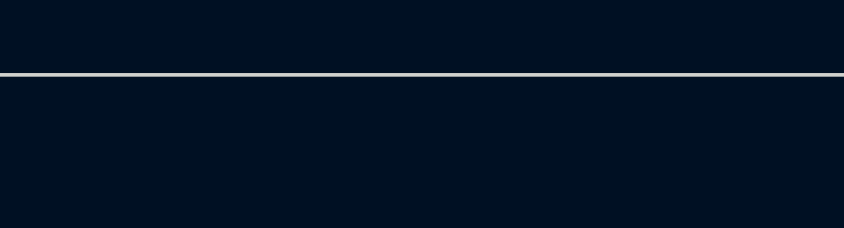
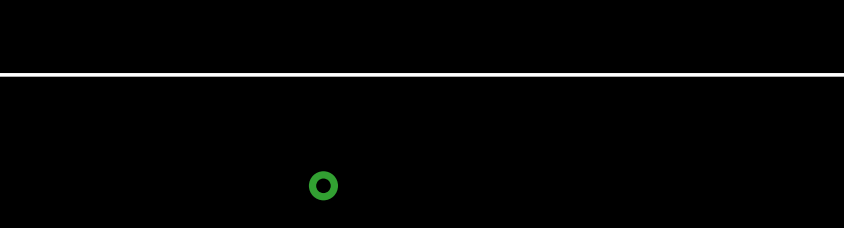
via: none -> (323, 185)

